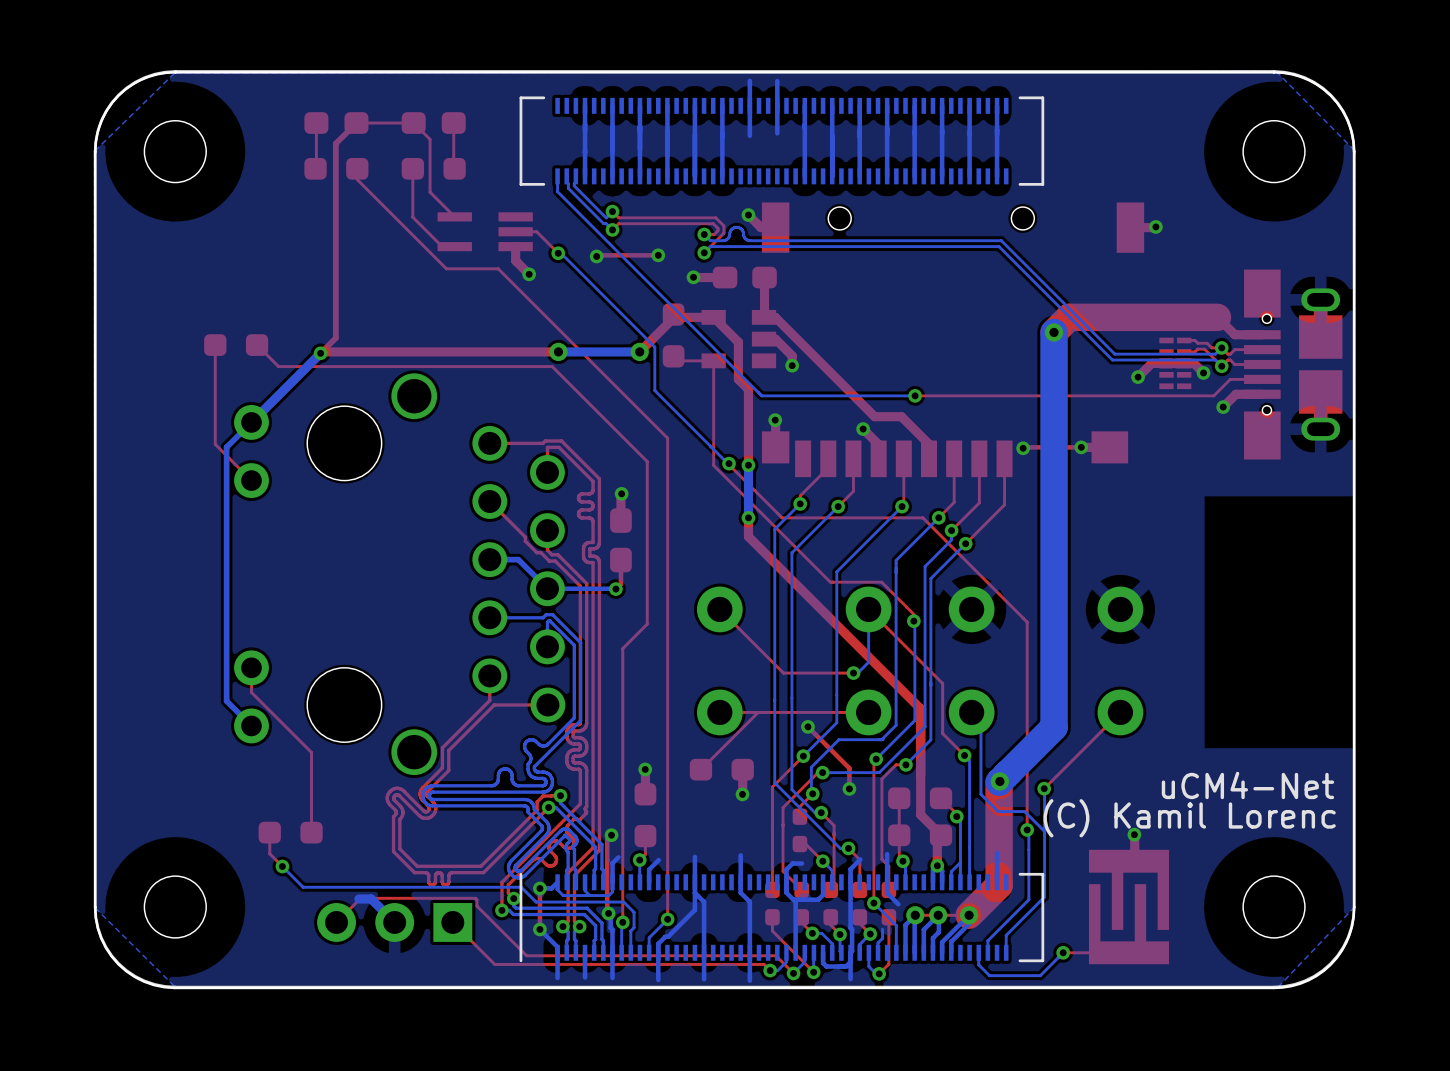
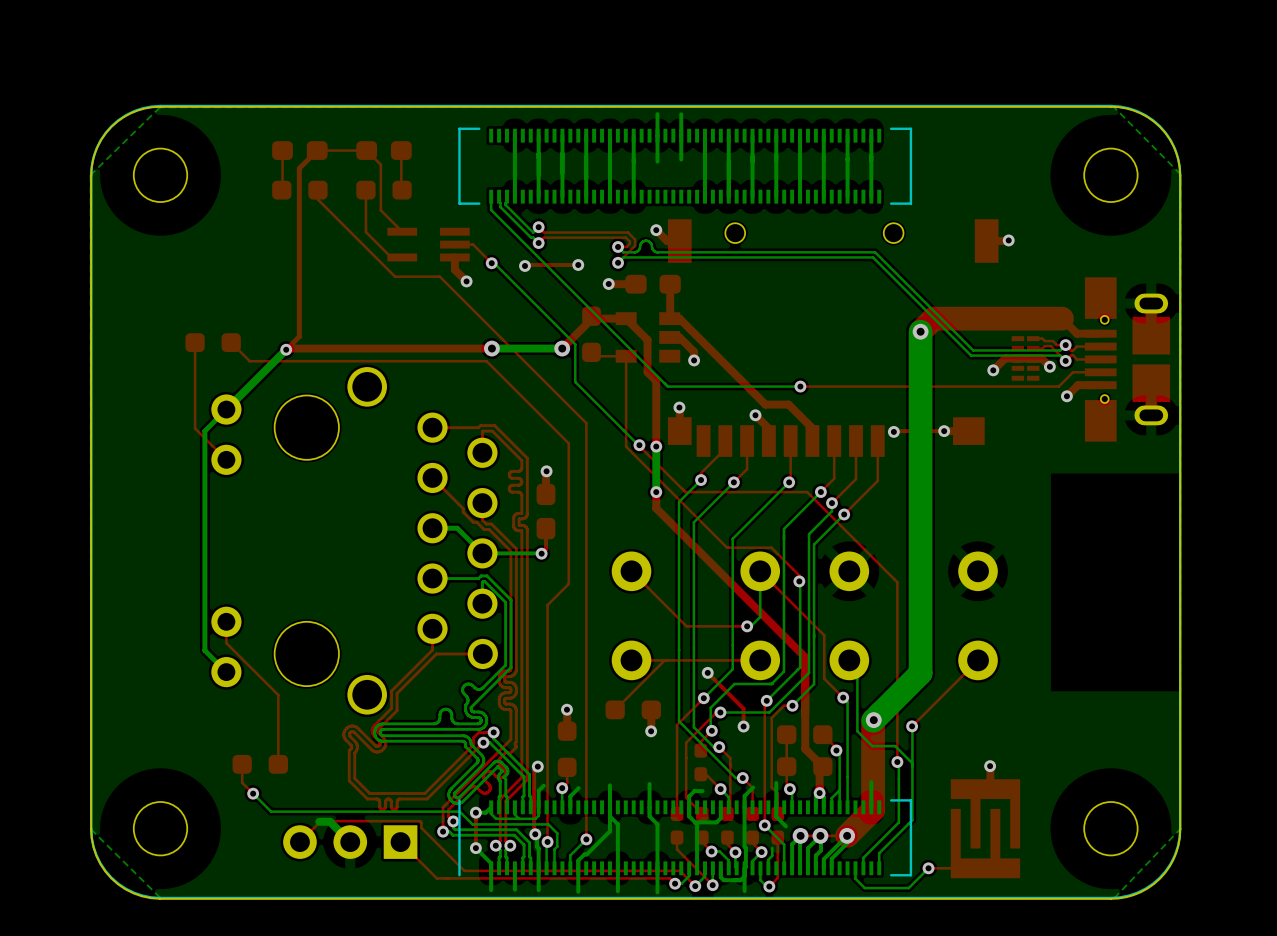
text: uCM4-Net (1247, 785) -> none
text: (C) Kamil Lorenc (1189, 818) -> none

